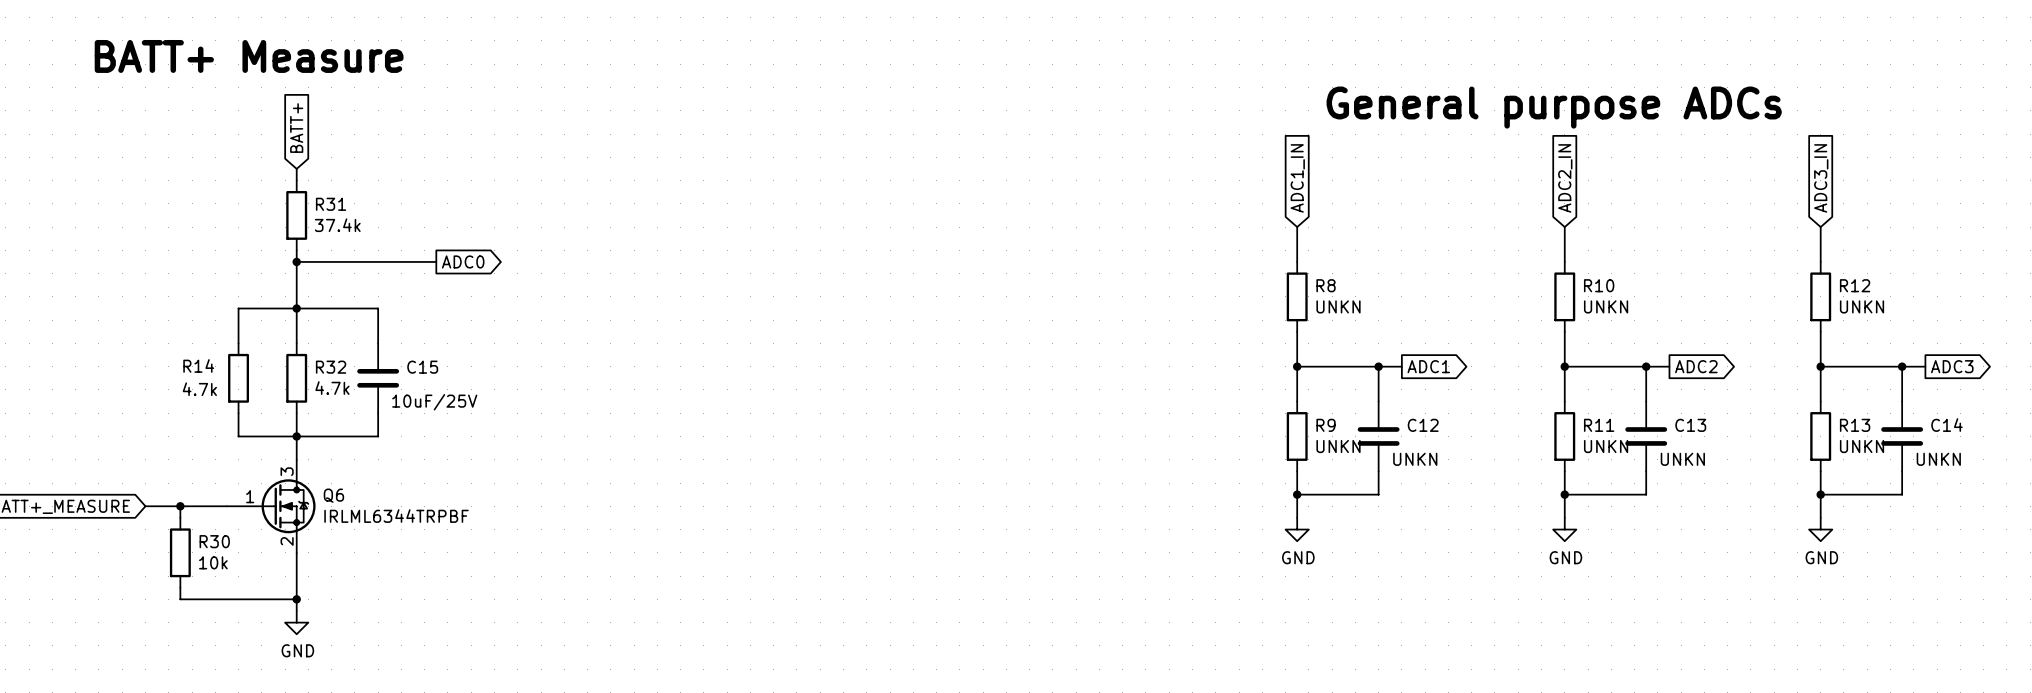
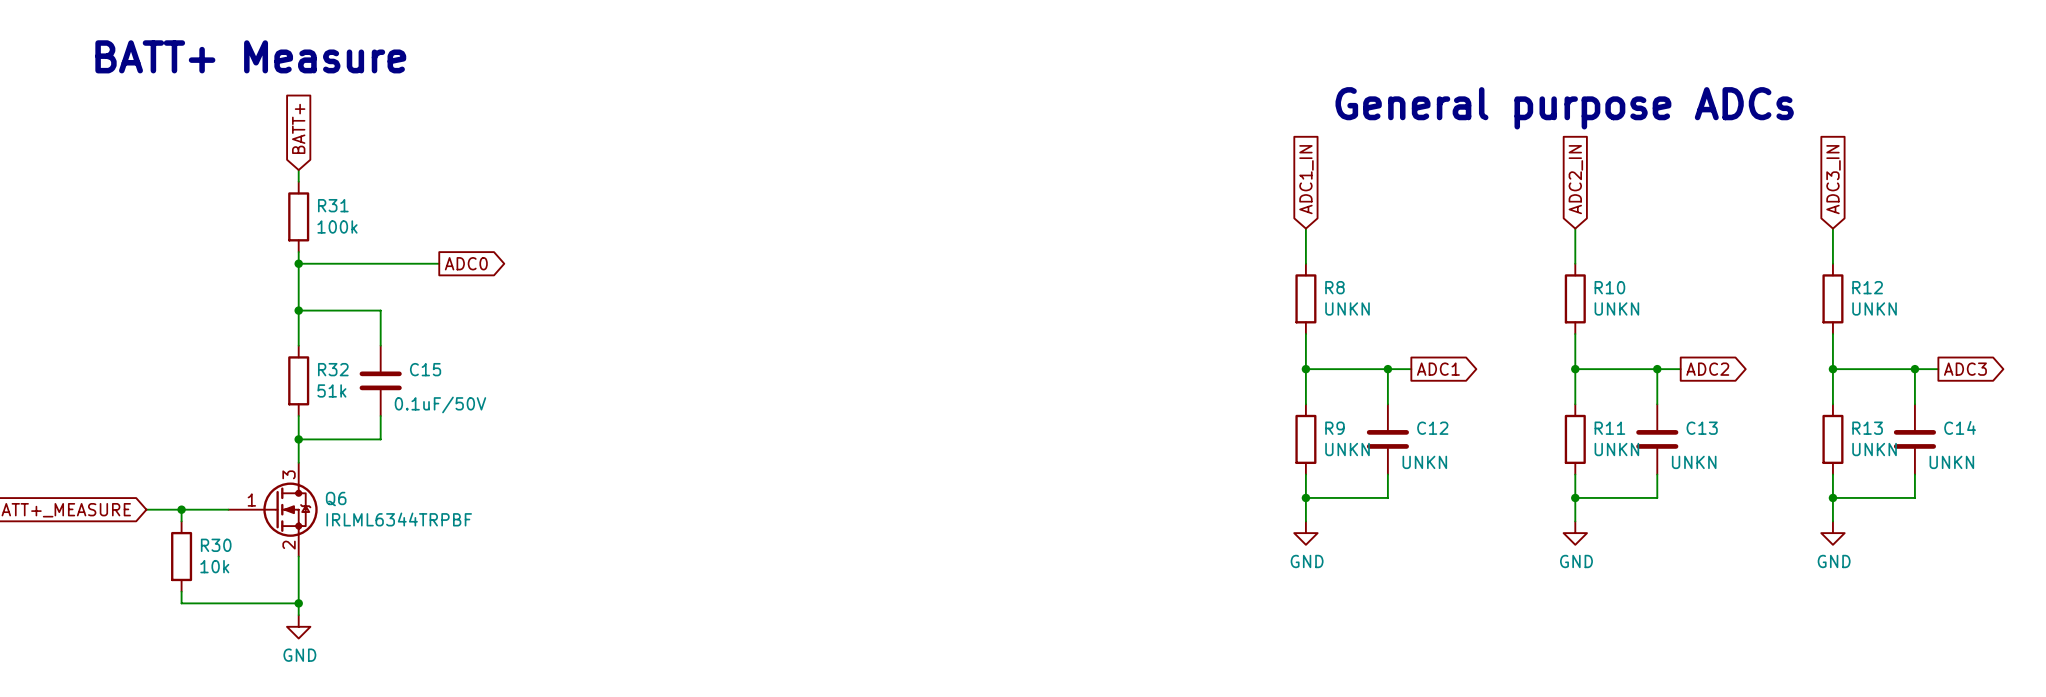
R31 value: 37.4k (337, 225) -> 100k (337, 226)
wire: (296, 308) (238, 308) (238, 343) -> none
R14: 4.7k (238, 378) -> none
R32 value: 4.7k (332, 388) -> 51k (331, 390)
C15 value: 10uF/25V (434, 402) -> 0.1uF/50V (440, 404)
wire: (238, 413) (238, 436) (296, 436) -> none

